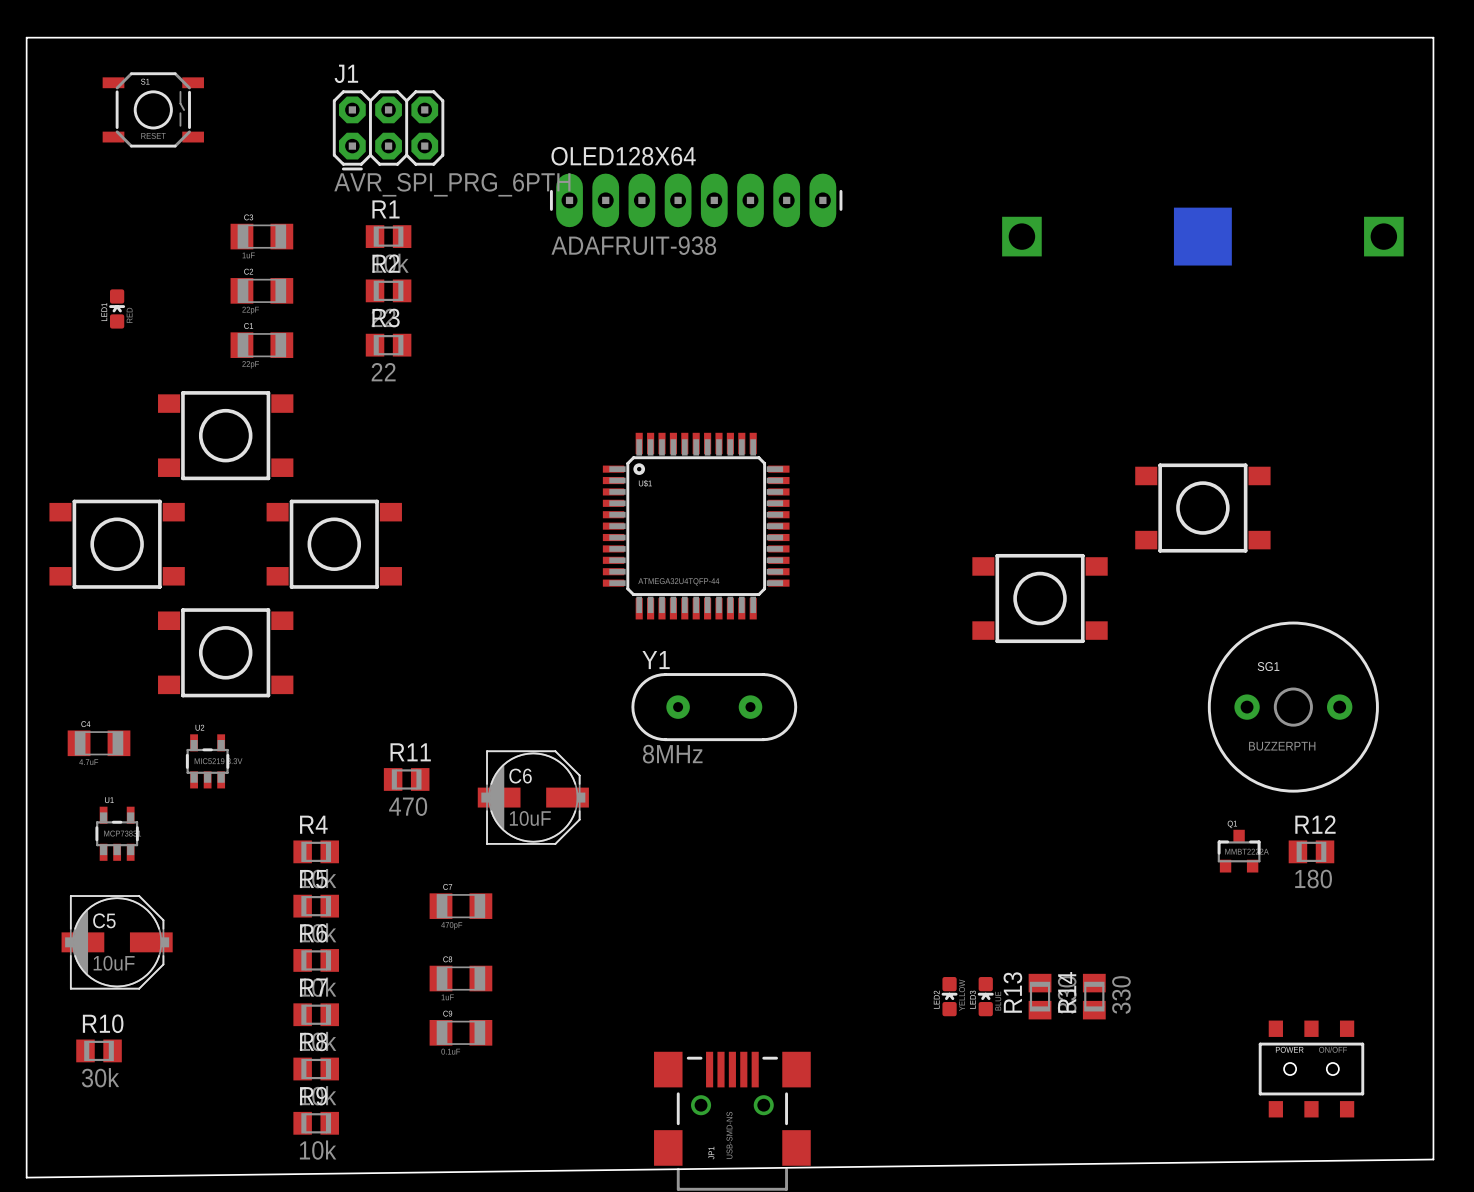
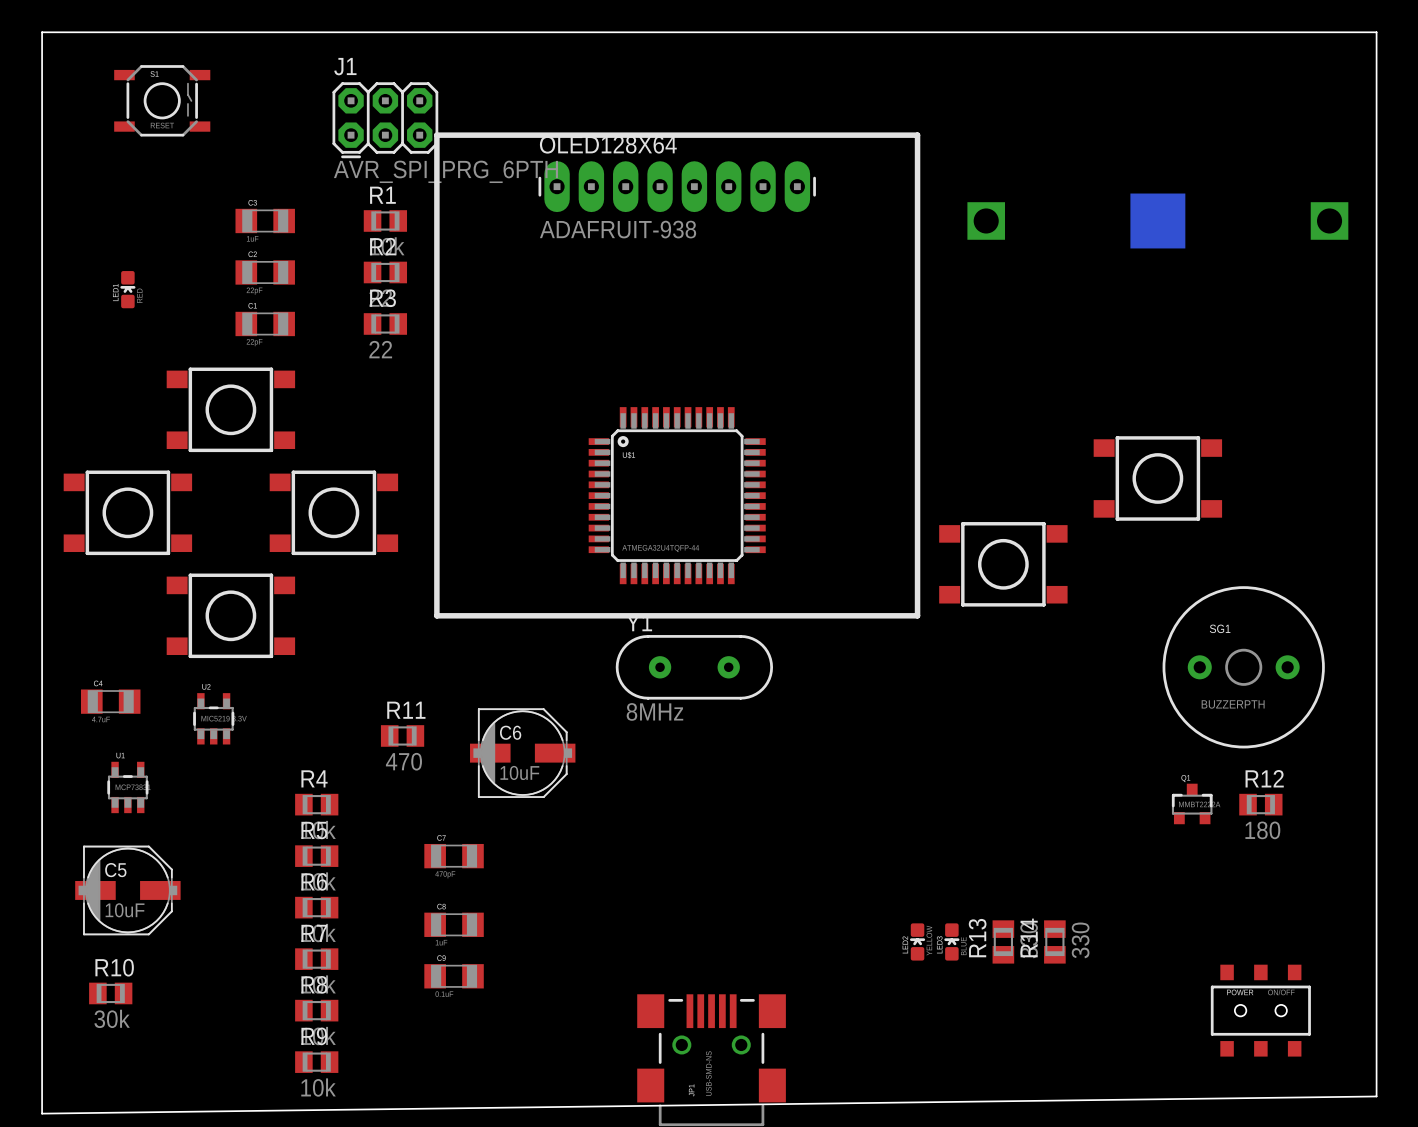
line: none -> (436, 135) (917, 135) (917, 615) (436, 615) (436, 135)

